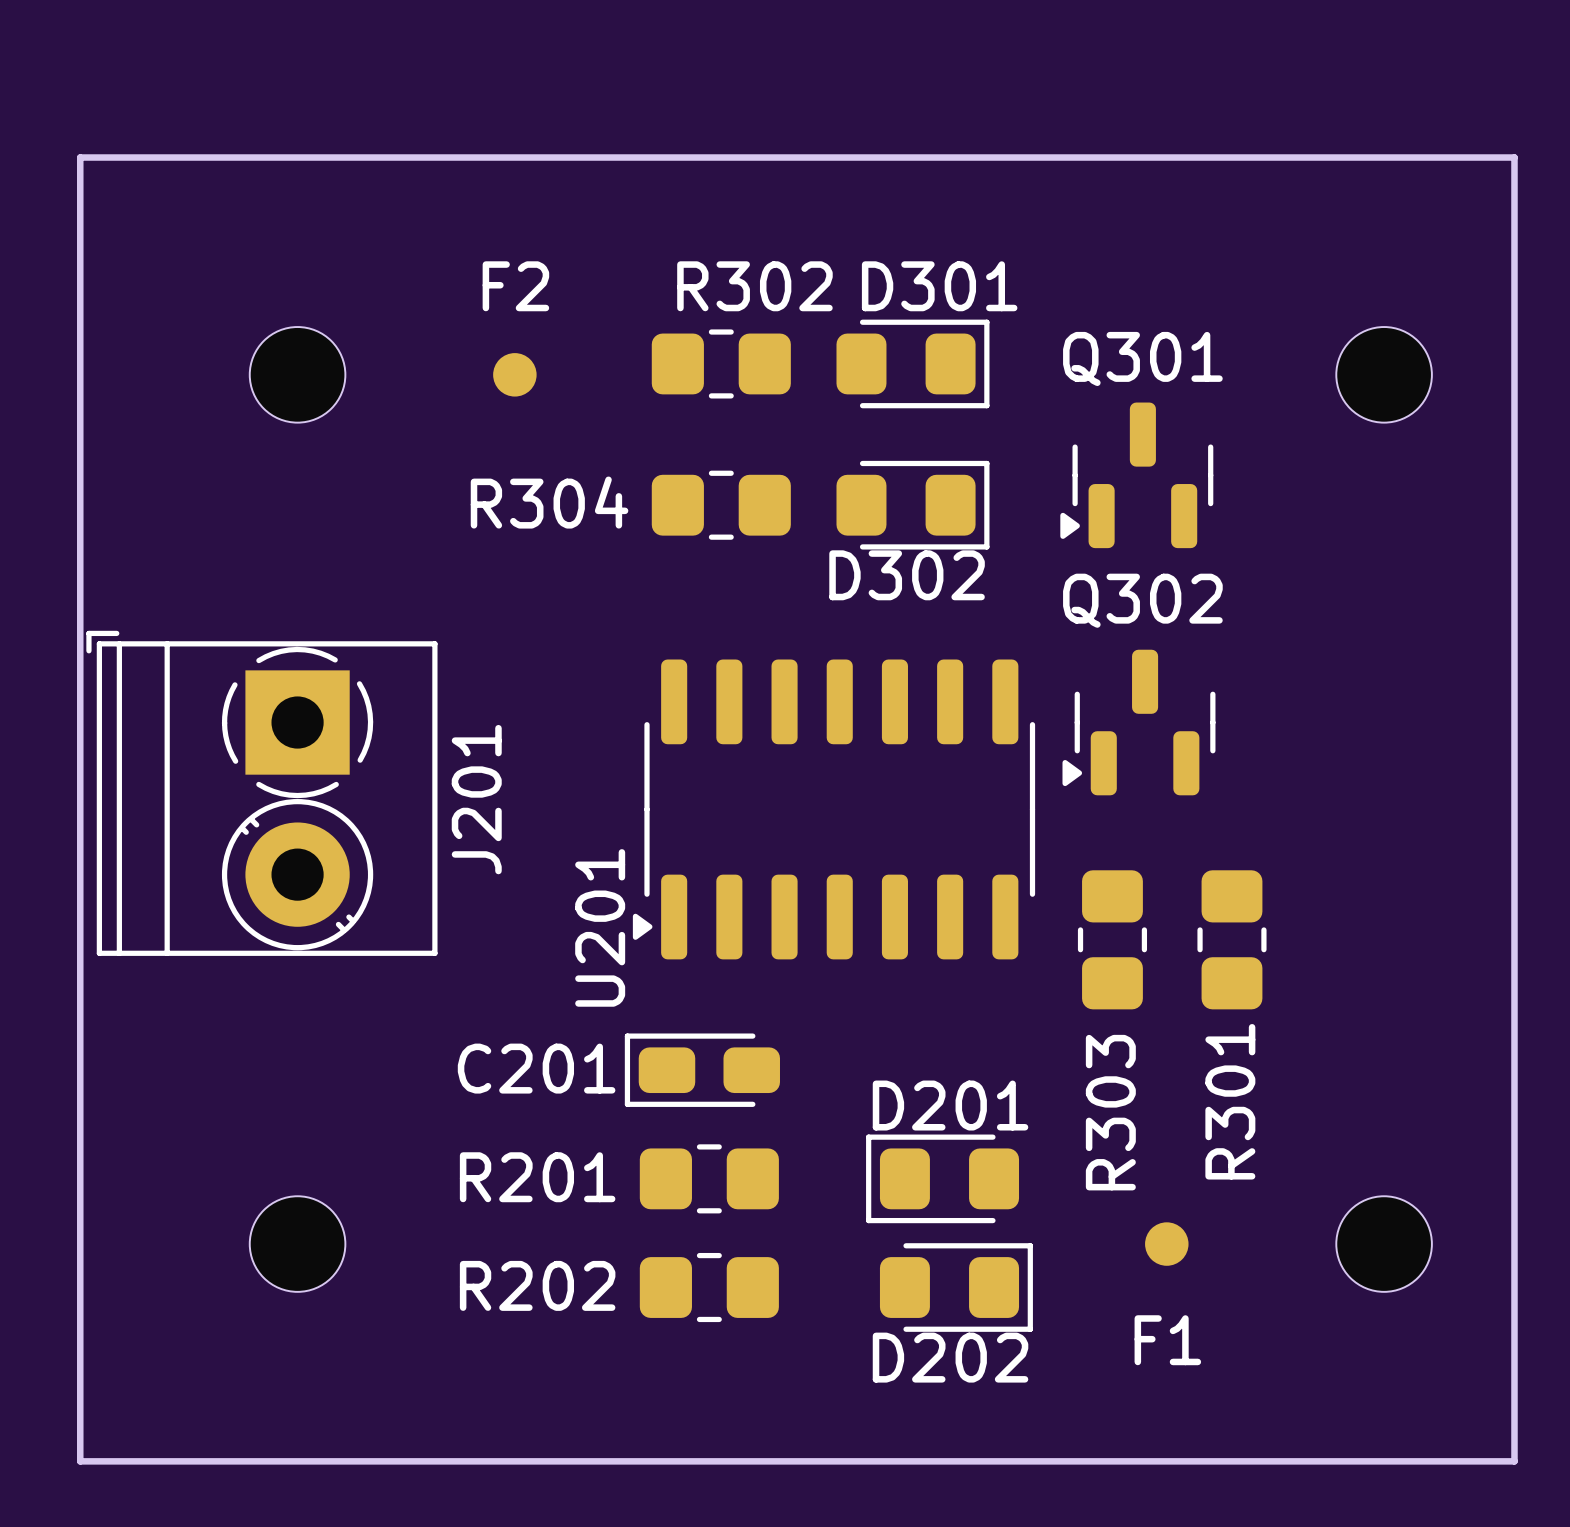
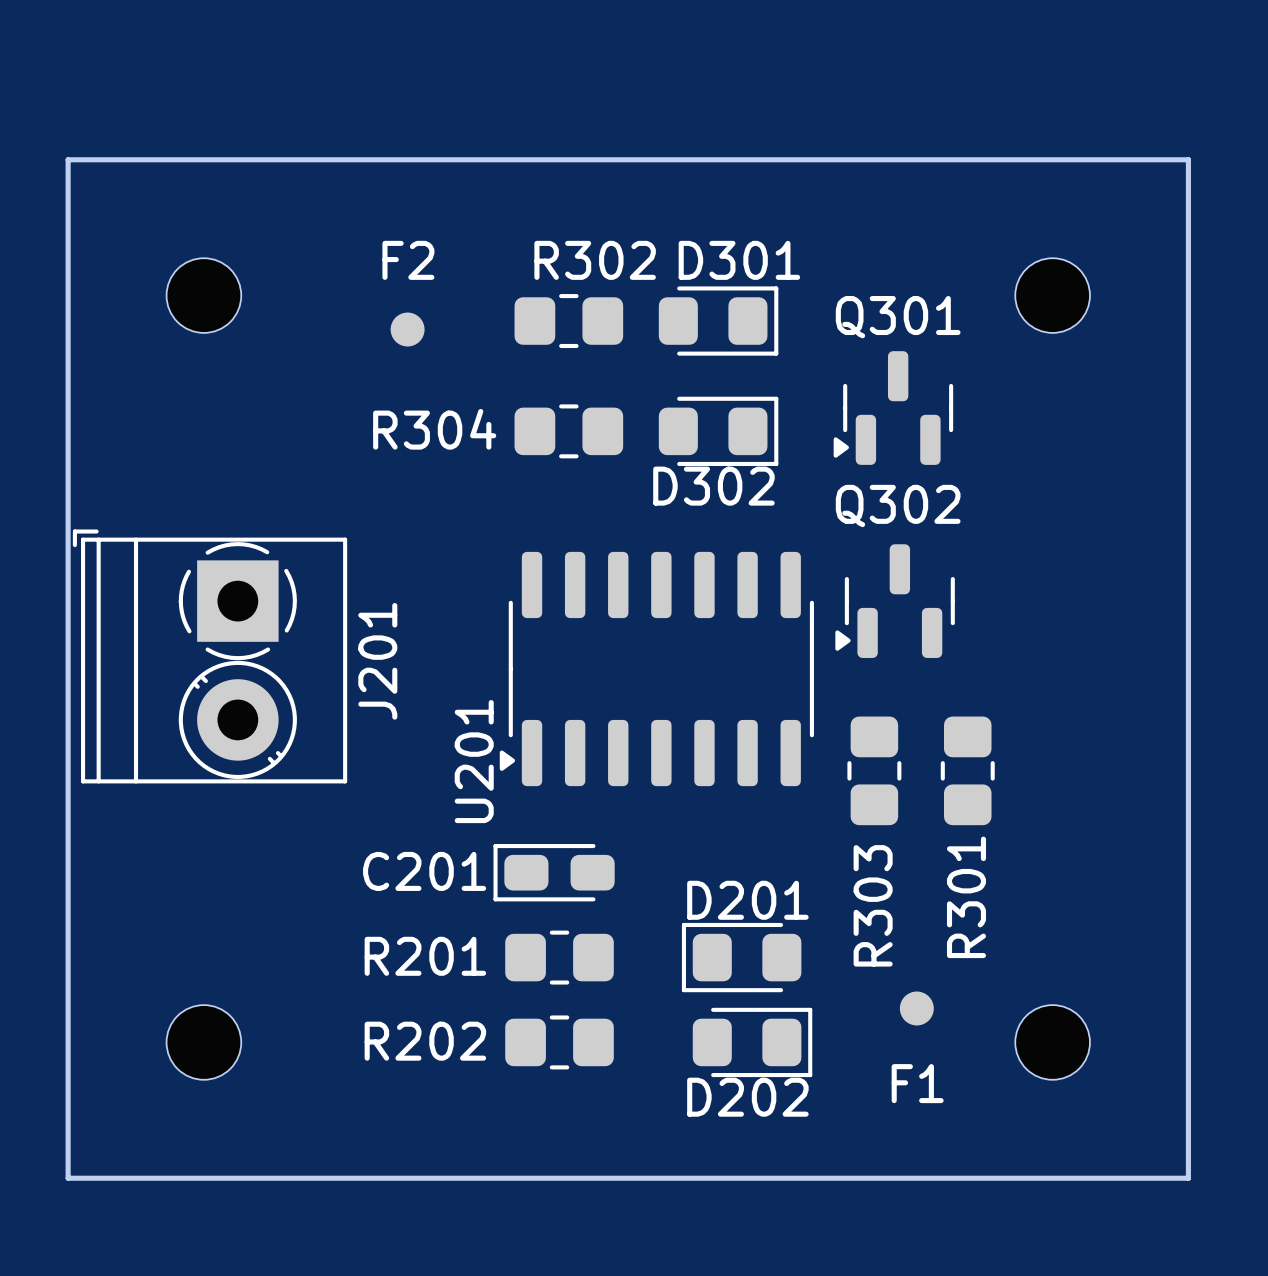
part position: (297, 374) -> (203, 295)
part position: (1384, 374) -> (1052, 295)
part position: (297, 1244) -> (203, 1042)
part position: (1384, 1244) -> (1052, 1042)

